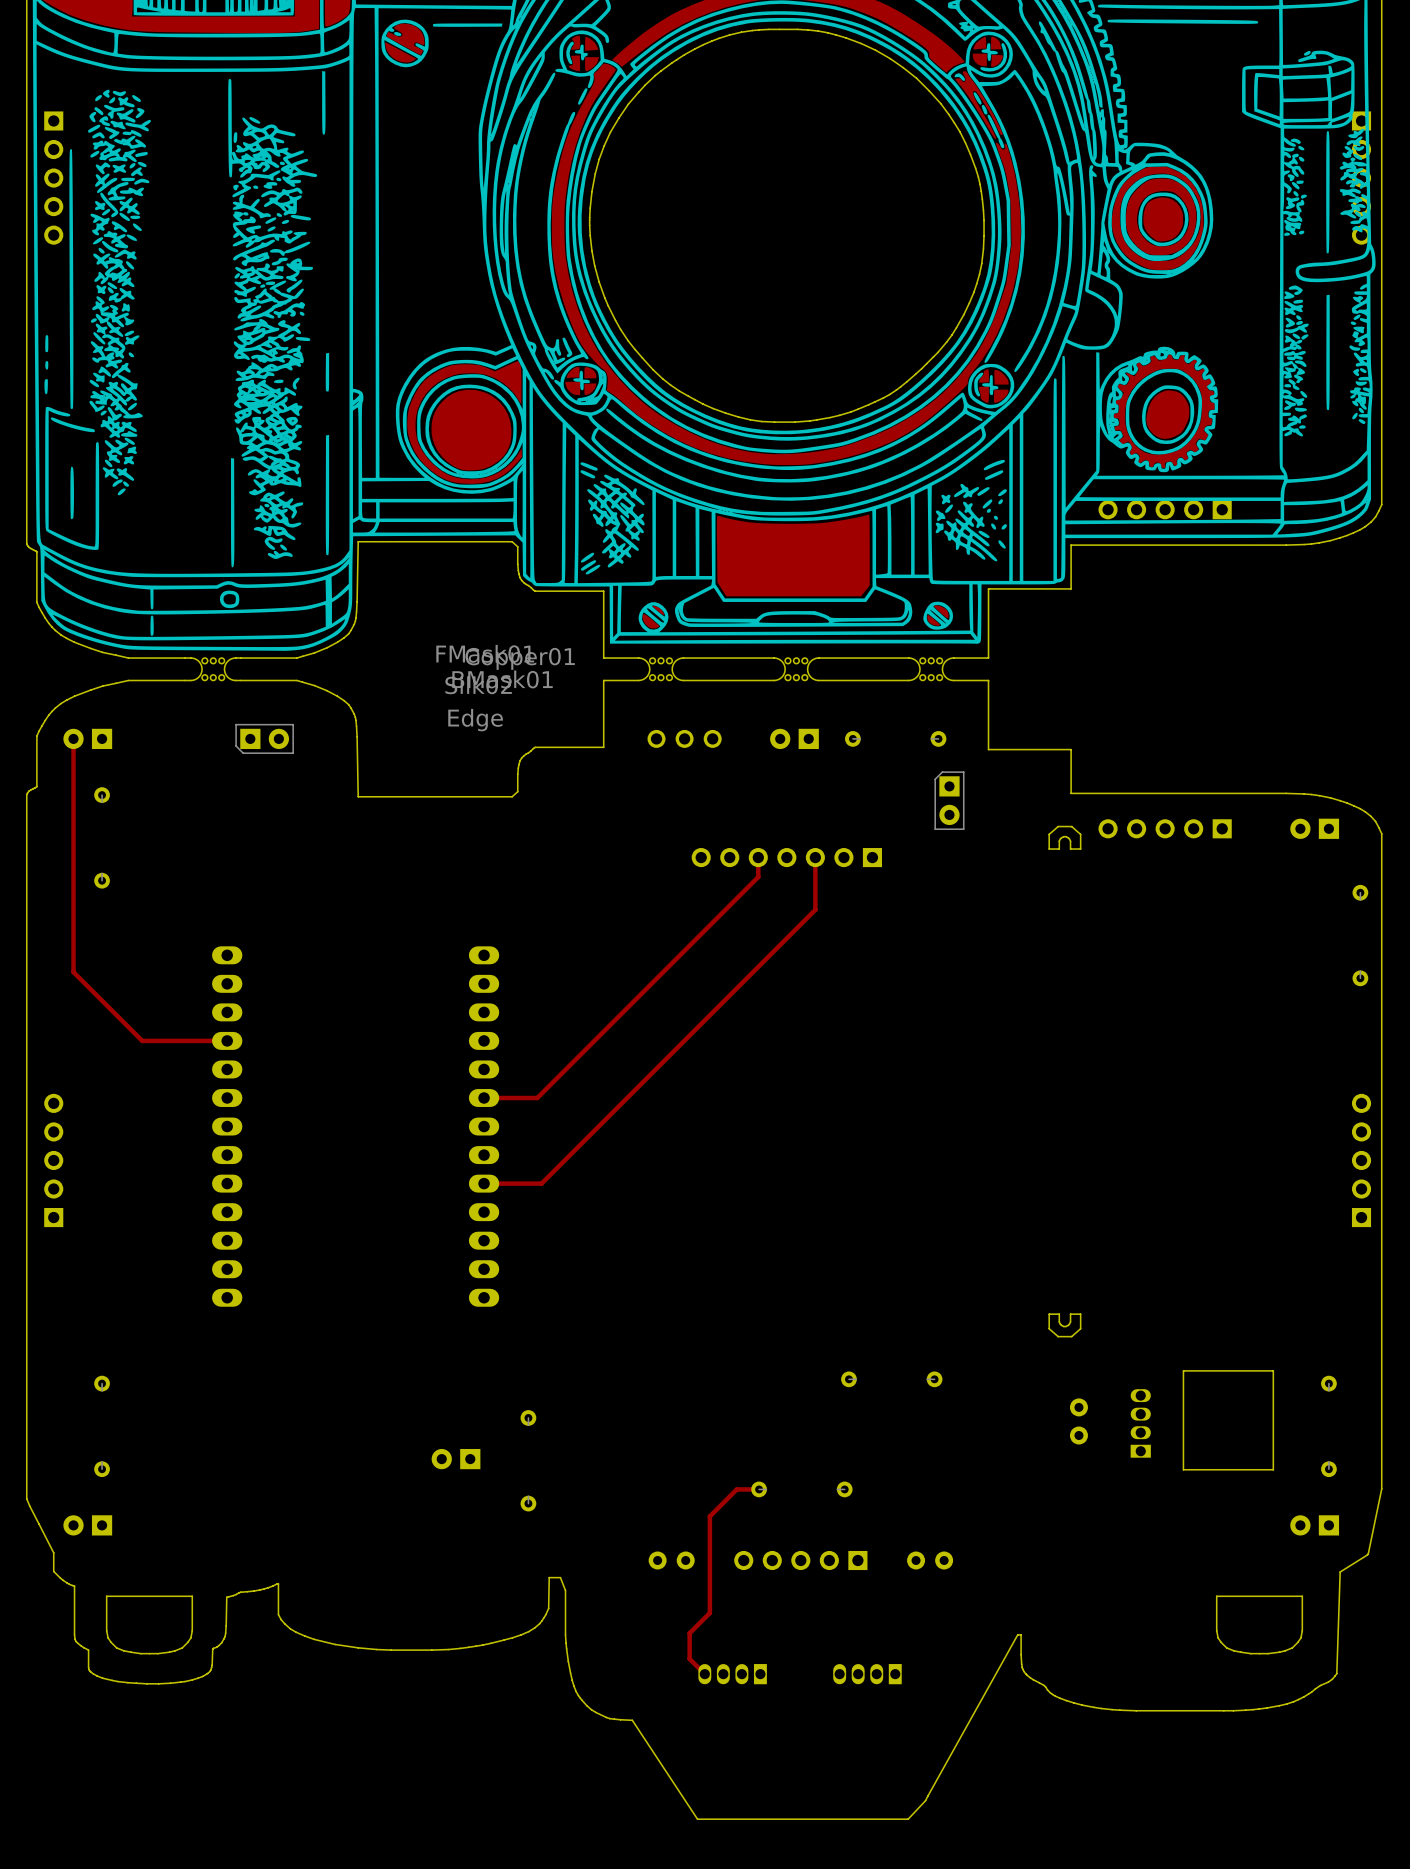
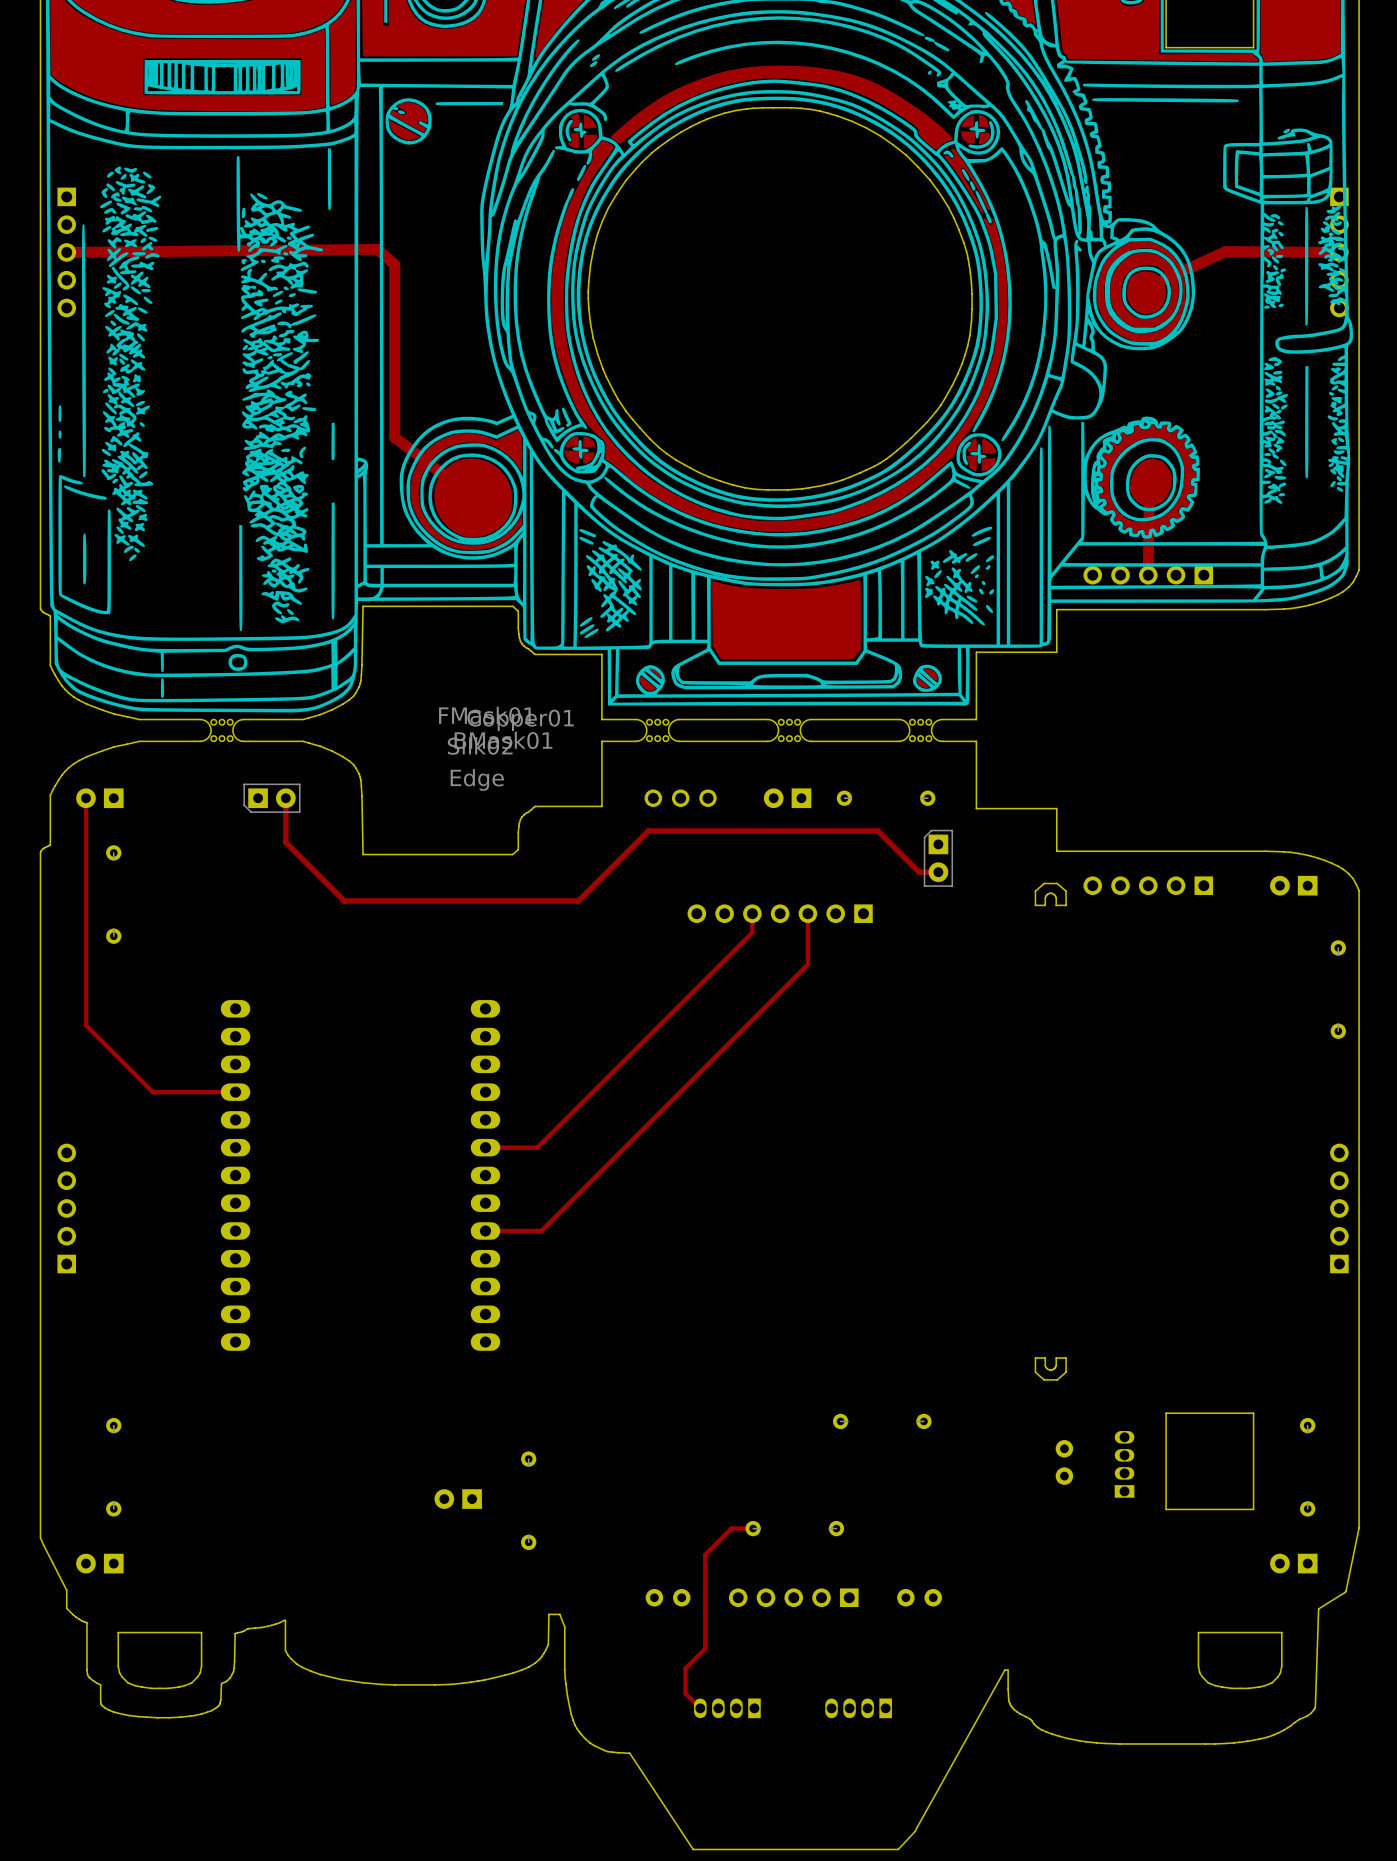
track: none -> (66, 252) (377, 249) (394, 264) (394, 437) (451, 481)
track: none -> (1339, 252) (1225, 251) (1149, 286)
track: none -> (1149, 500) (1148, 575)
track: none -> (285, 798) (285, 842) (344, 901) (578, 901) (648, 831) (878, 831) (919, 872) (938, 872)

